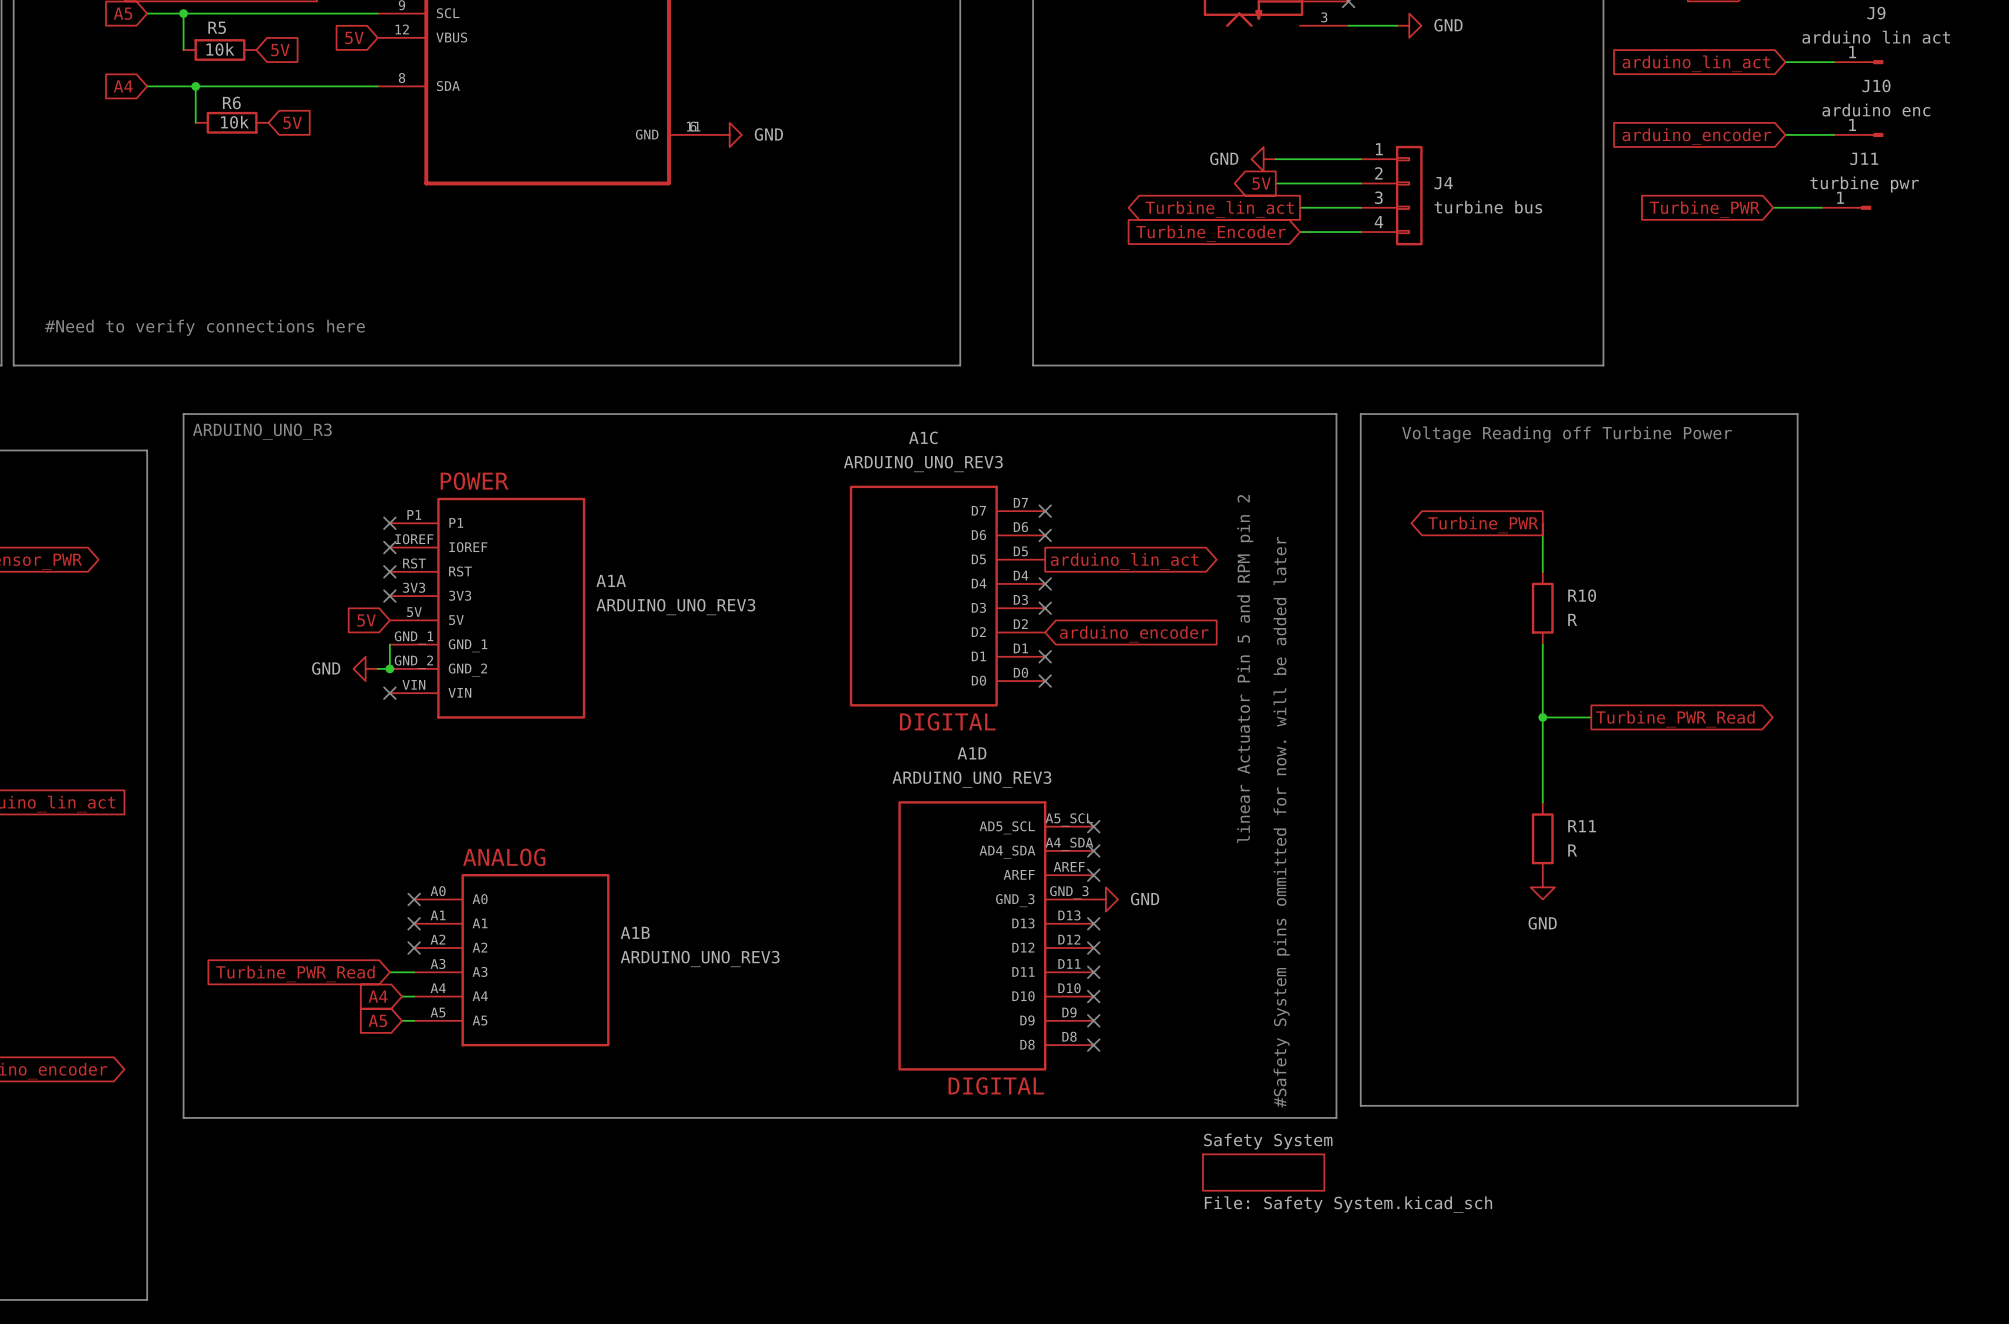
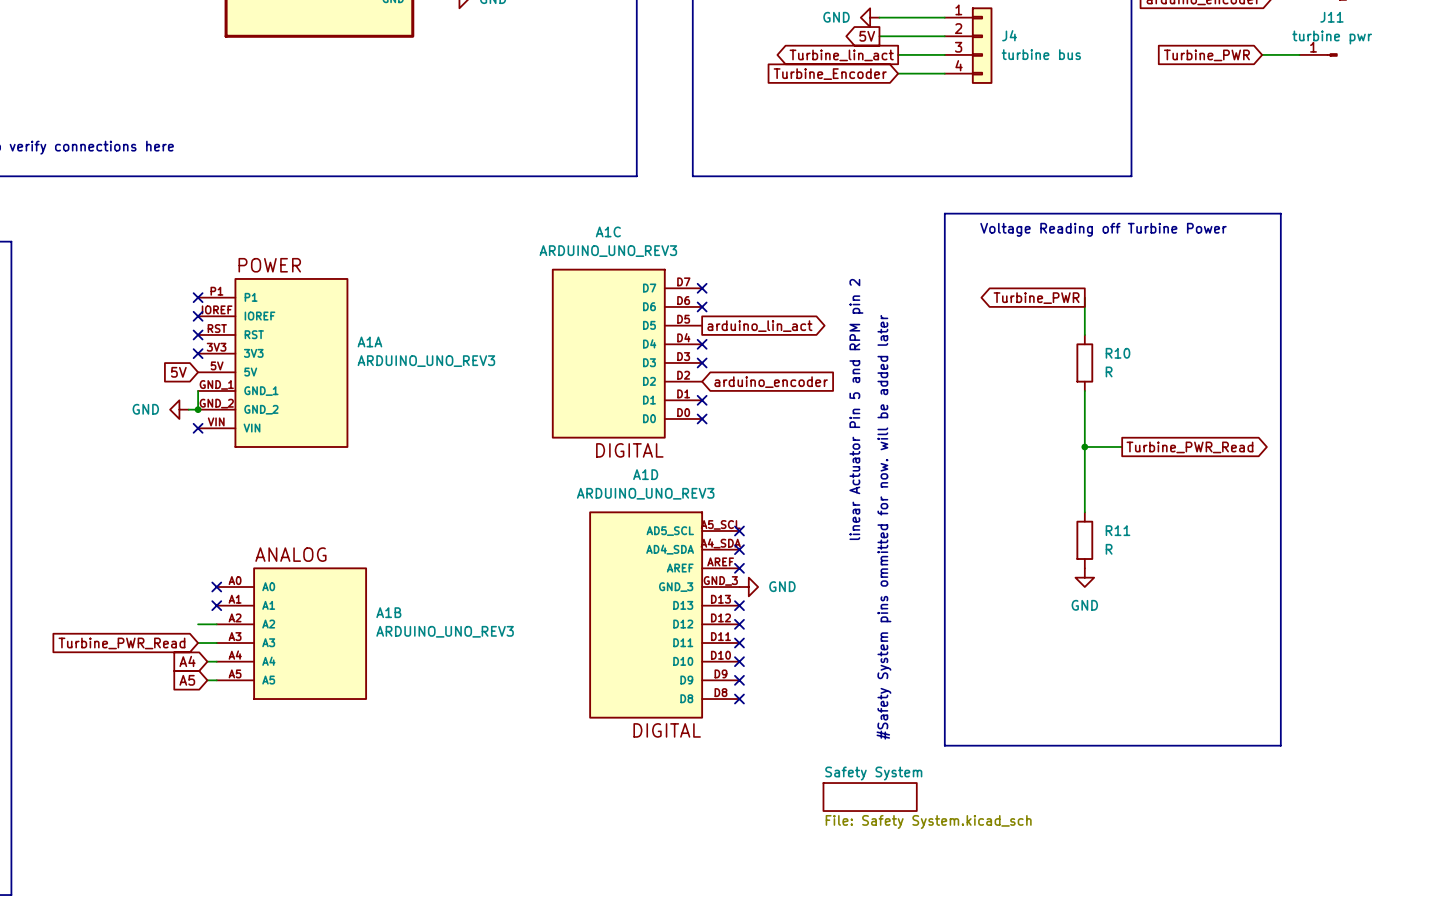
line: (183, 414) (1336, 414) (1336, 1117) (183, 1117) (183, 414) -> none
text: ARDUINO_UNO_R3 (262, 431) -> none
wire: none -> (198, 624) (216, 624)
no-connect mark: (414, 948) -> none

